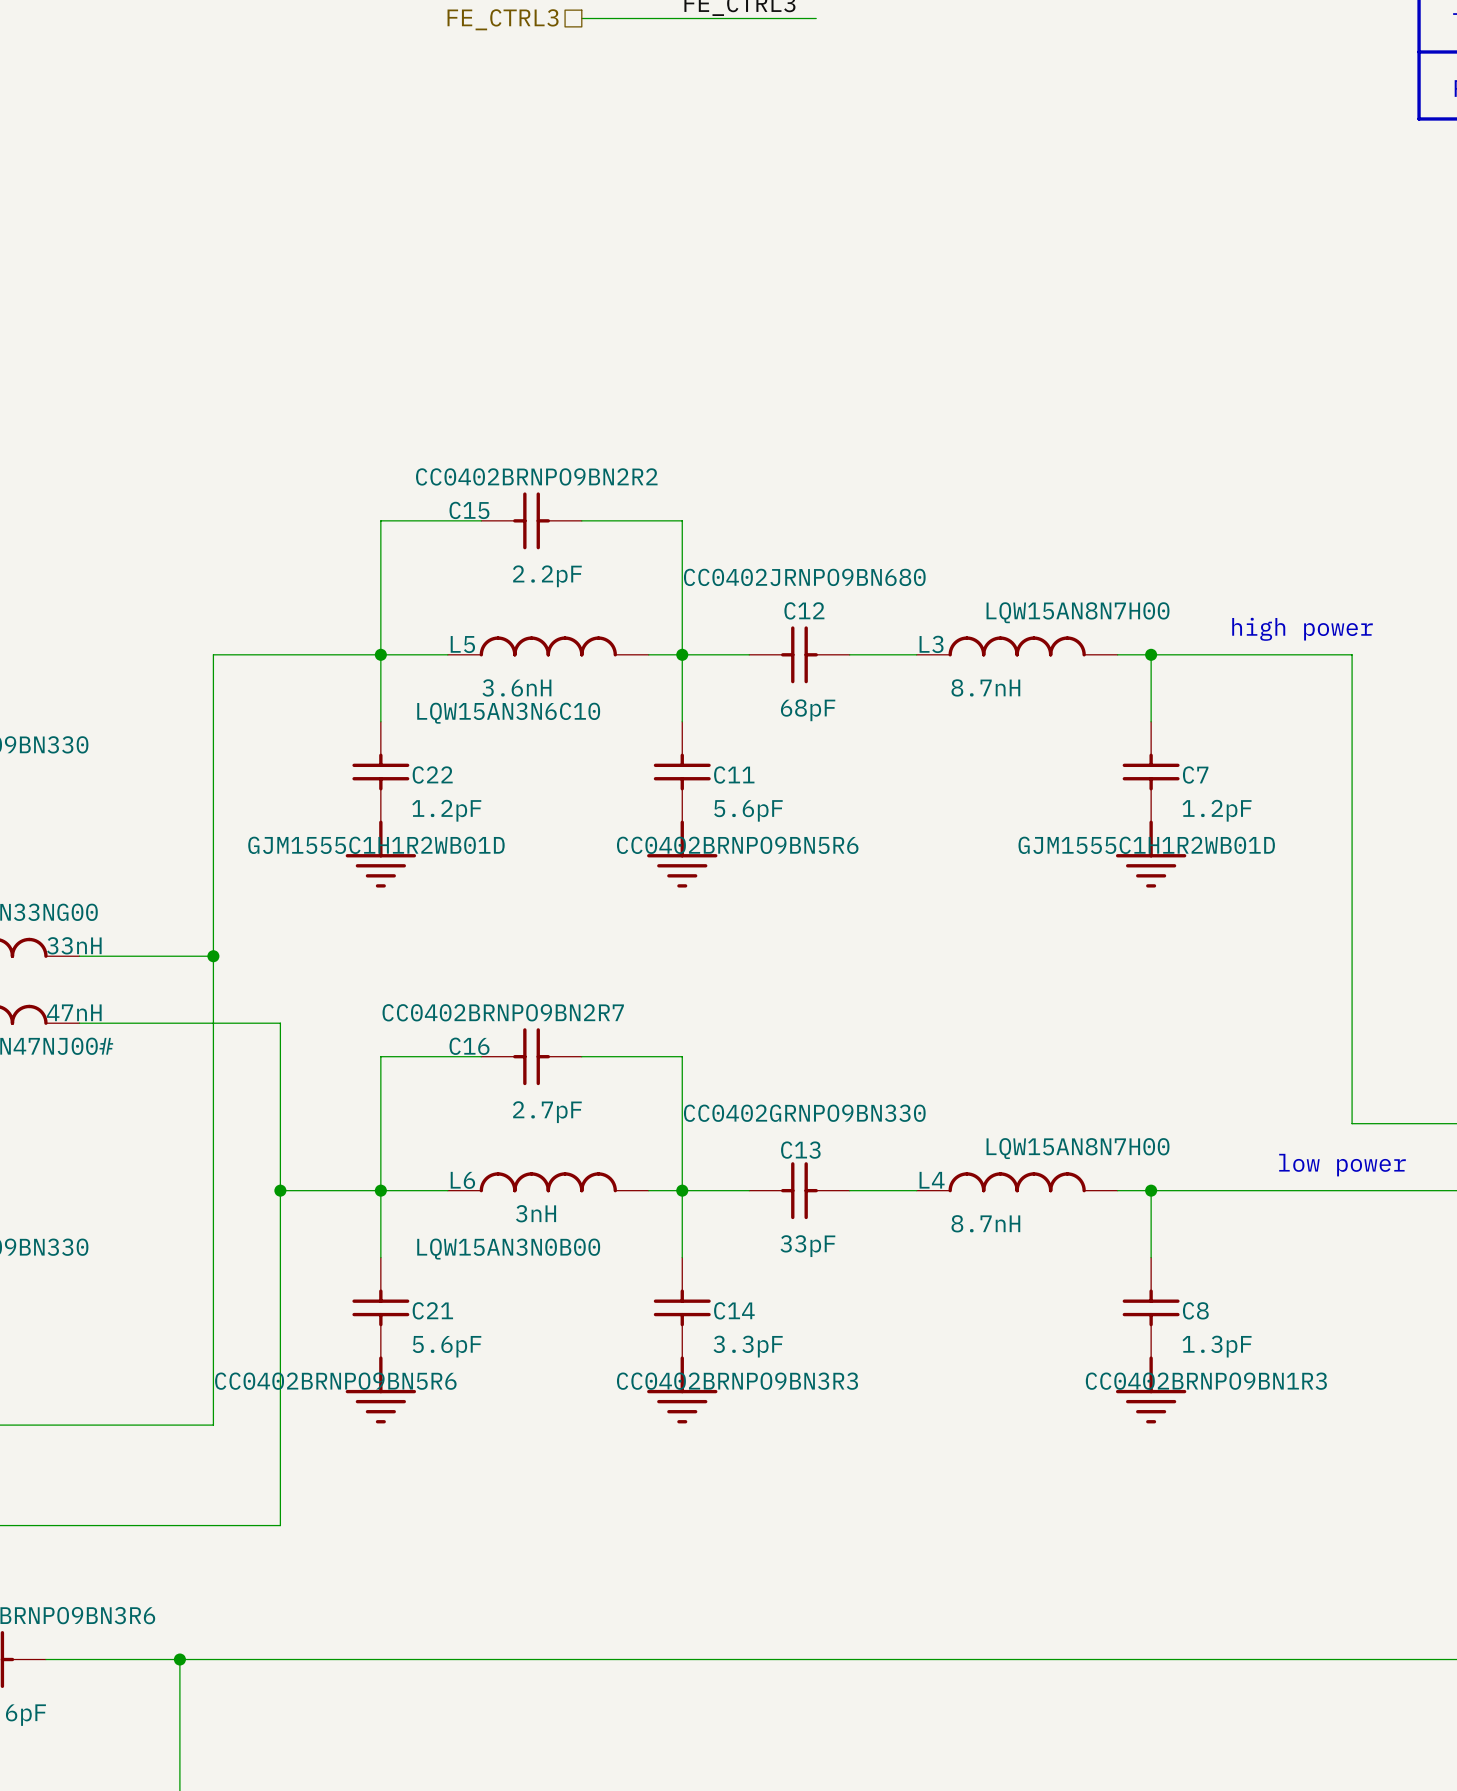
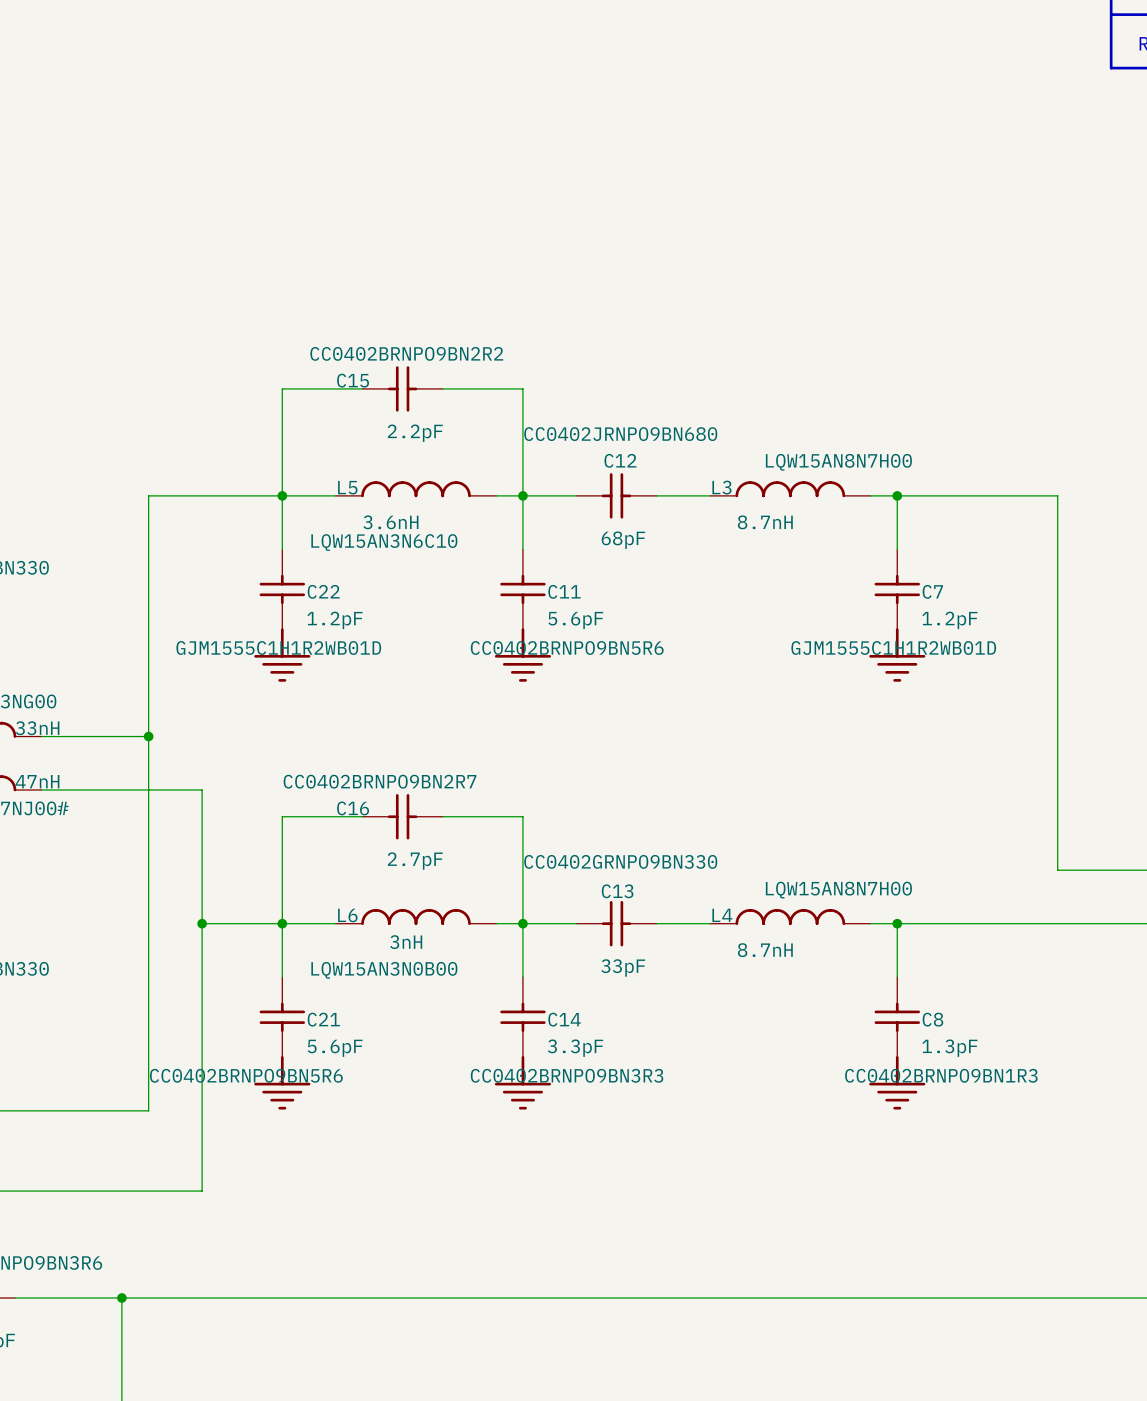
text: high power (1302, 629) -> none
text: low power (1342, 1165) -> none

